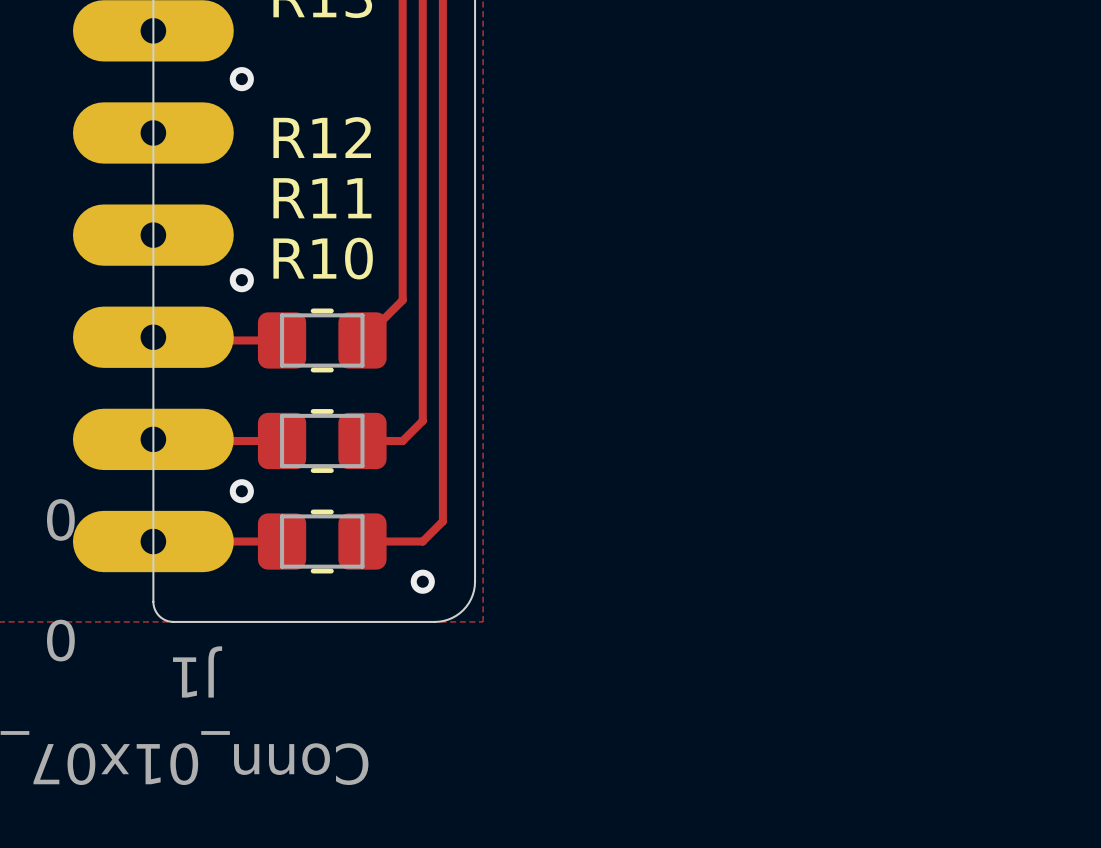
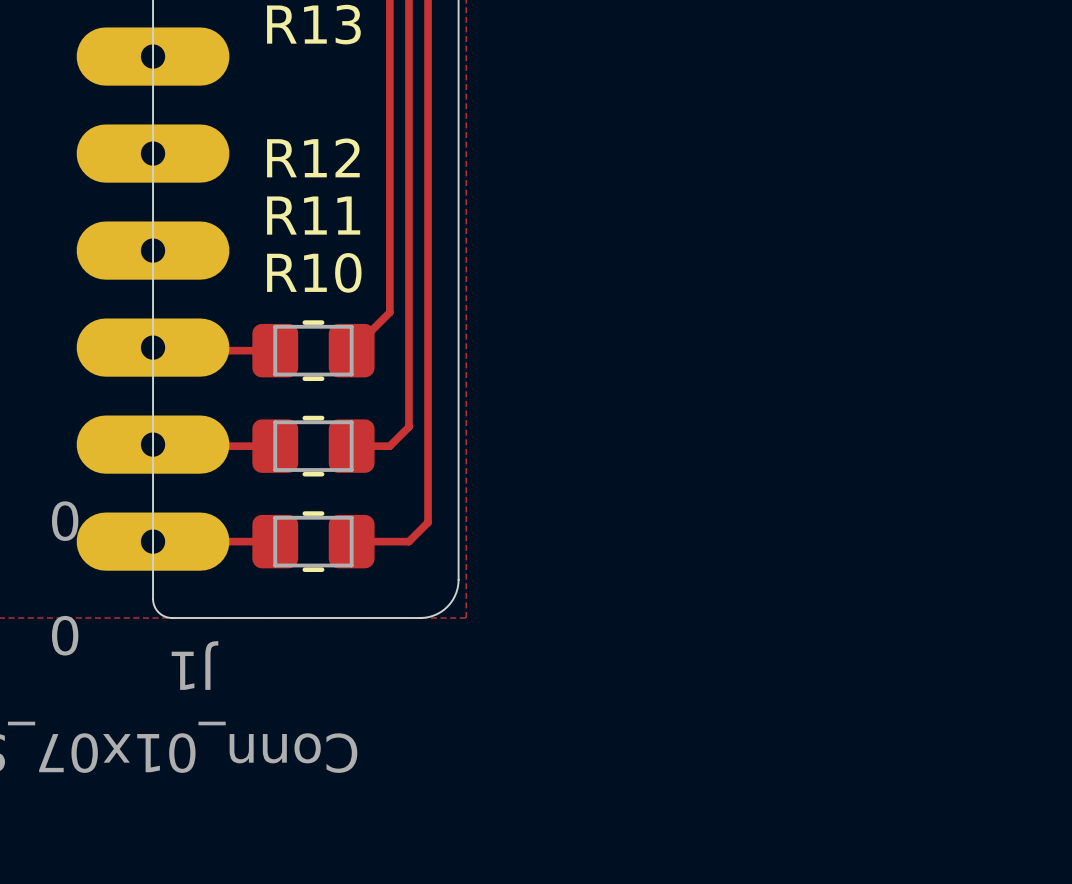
via: (241, 79) -> none
via: (241, 280) -> none
via: (241, 491) -> none
via: (422, 581) -> none

